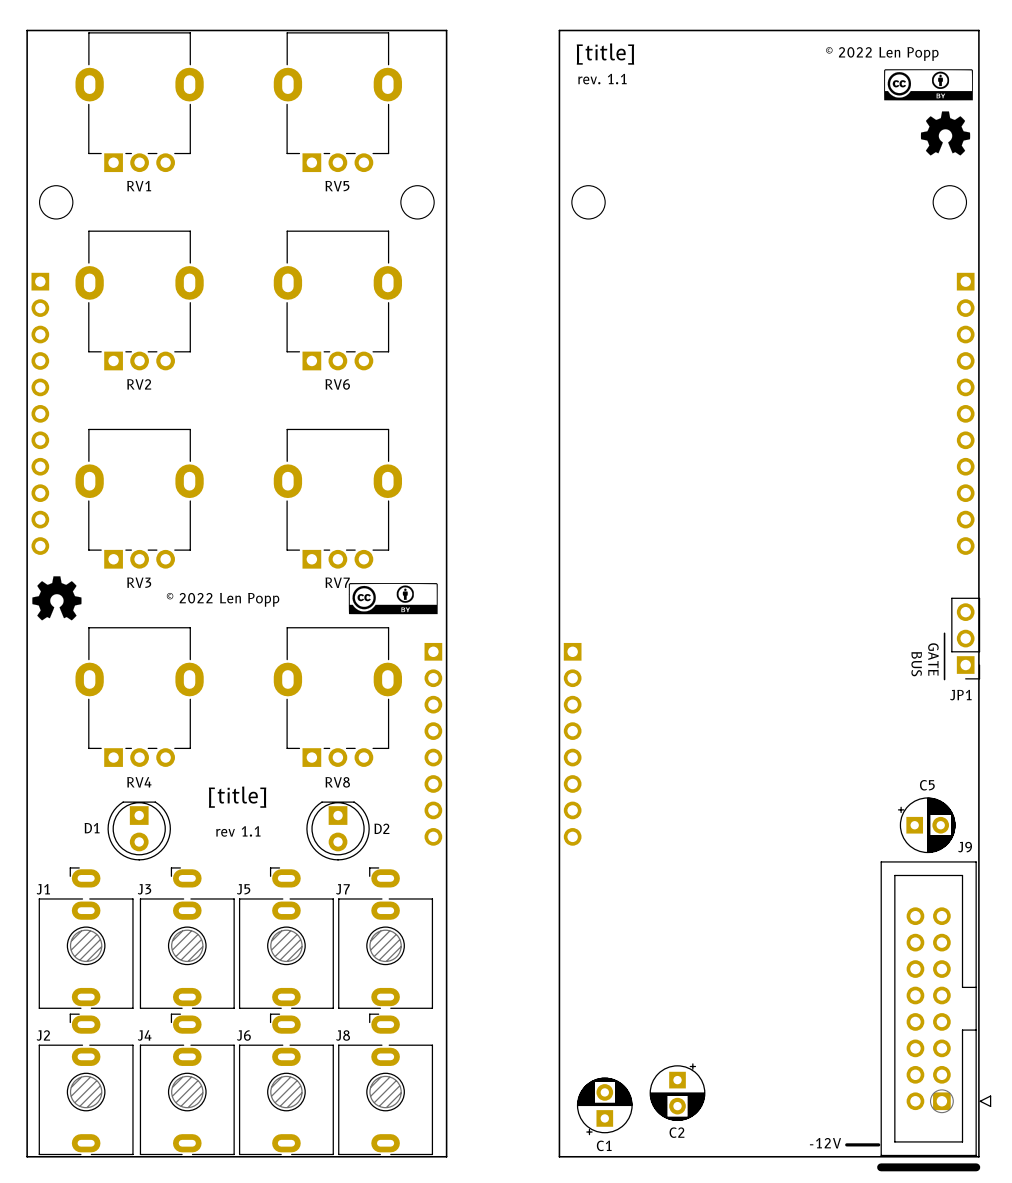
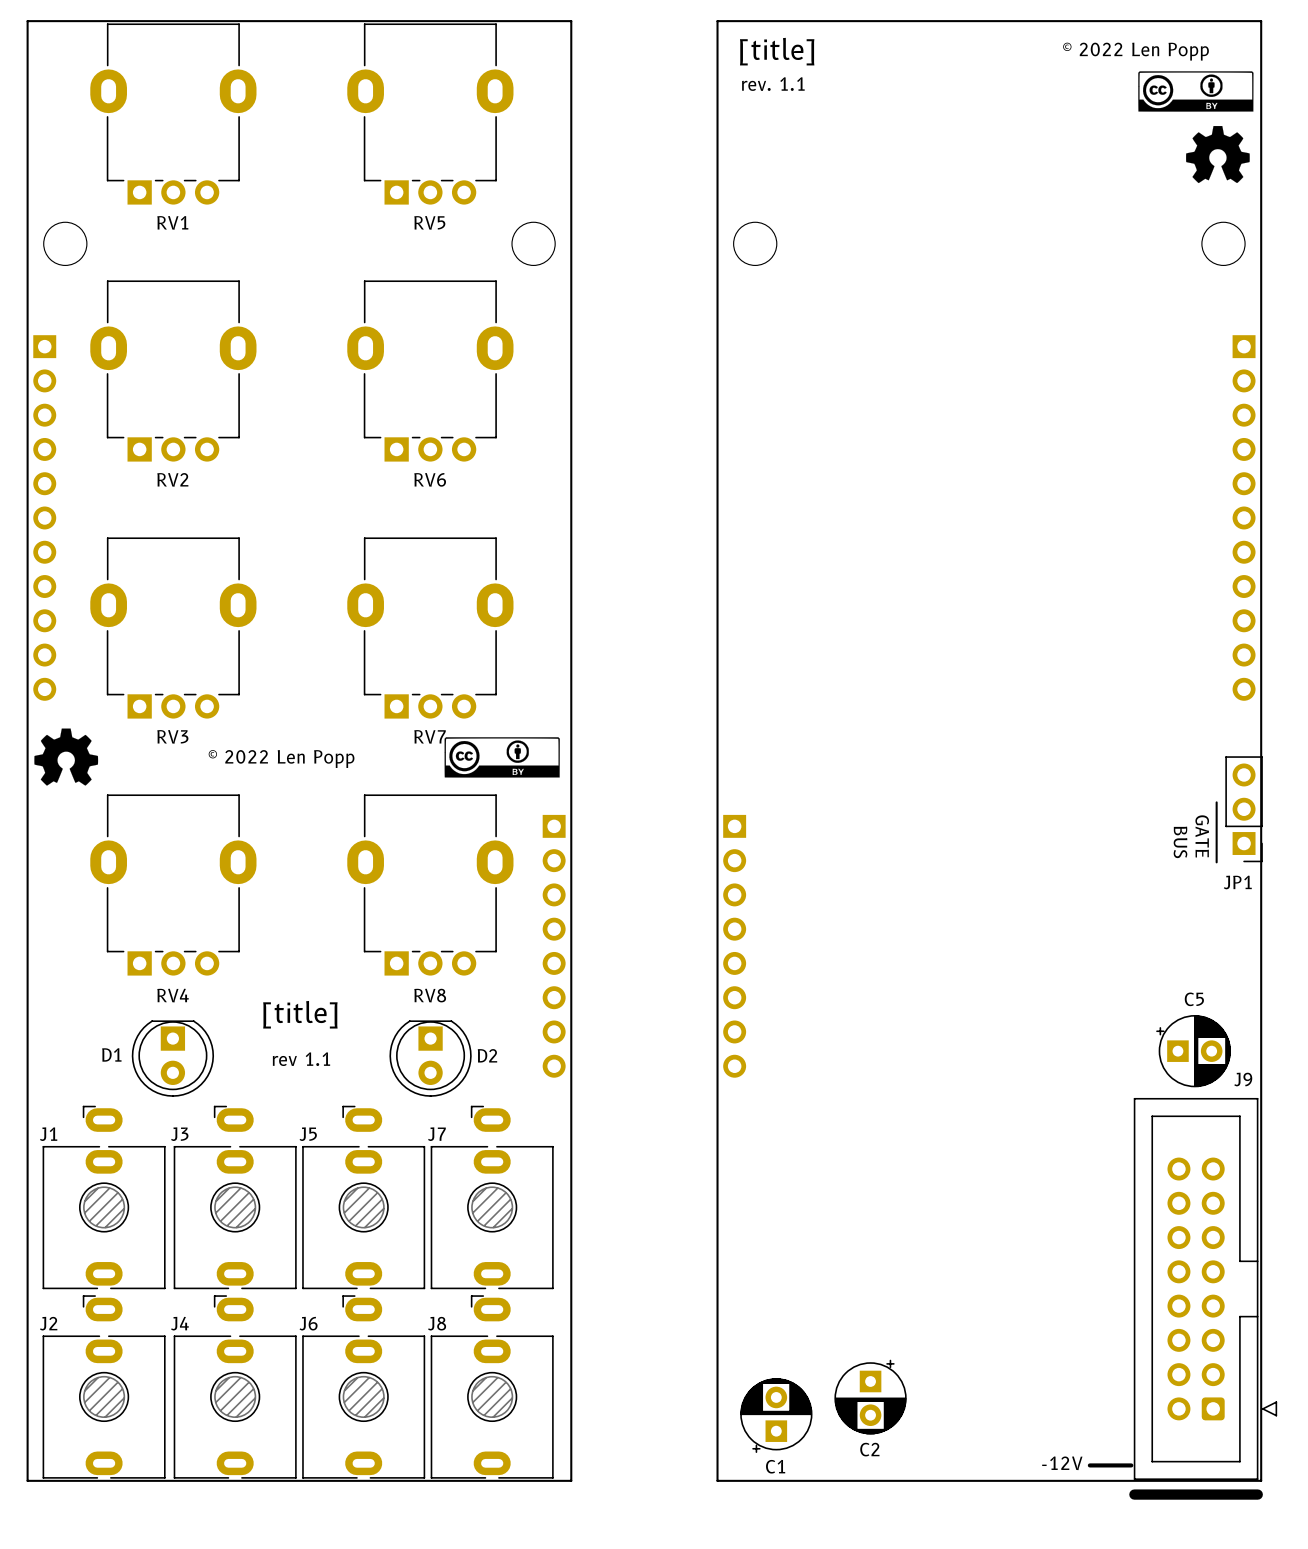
drawing: [930, 1089, 954, 1114] -> none

